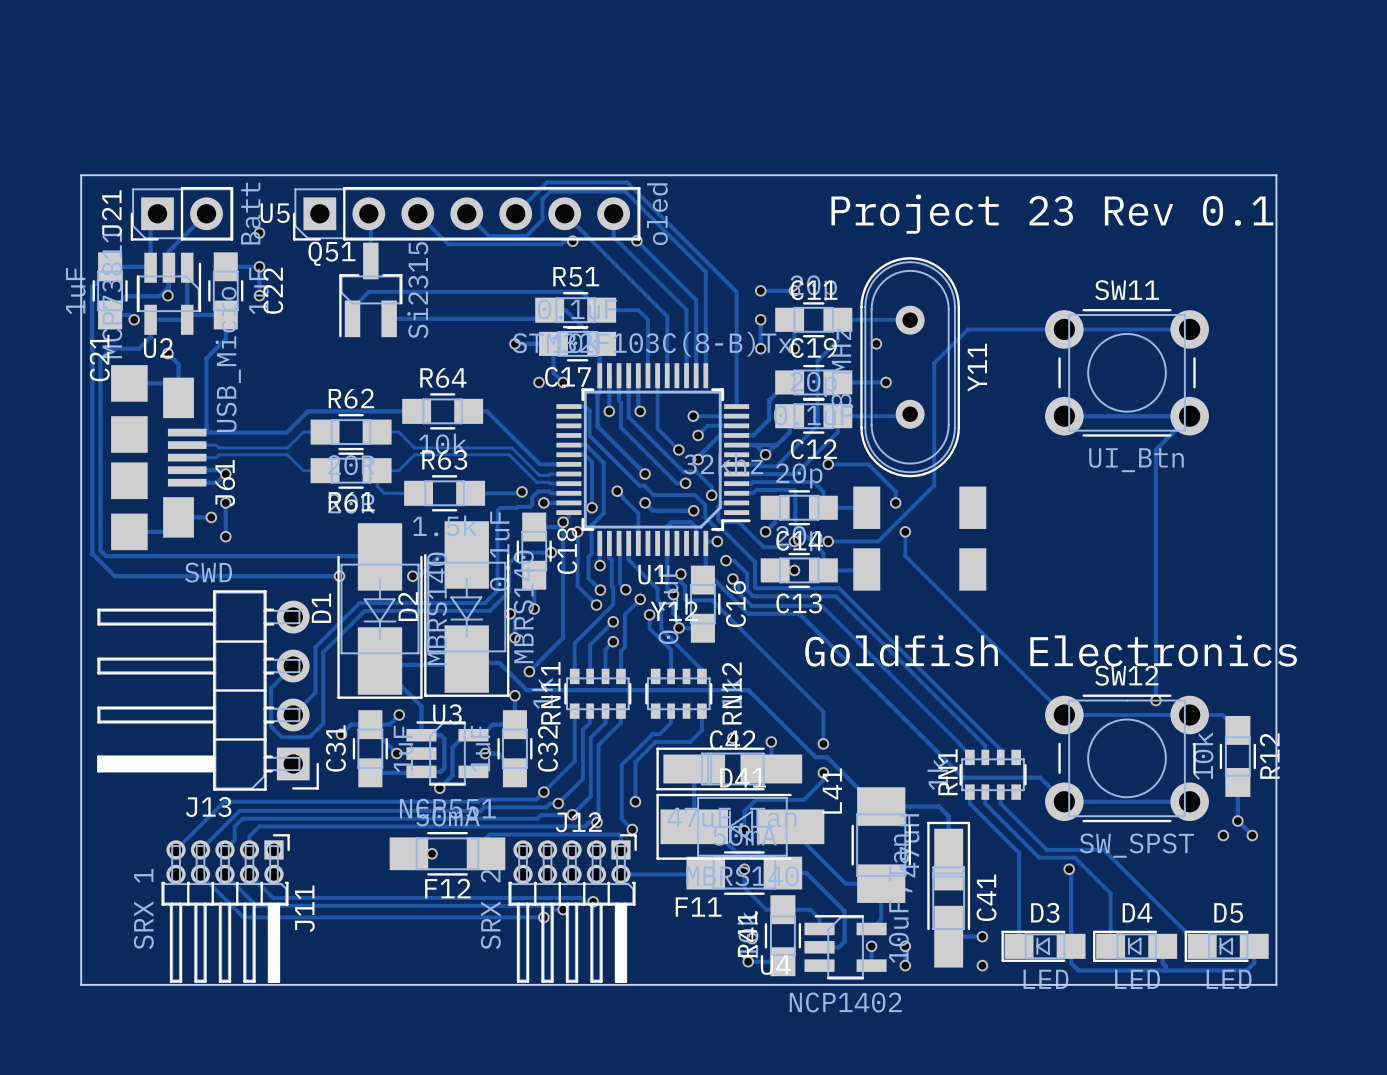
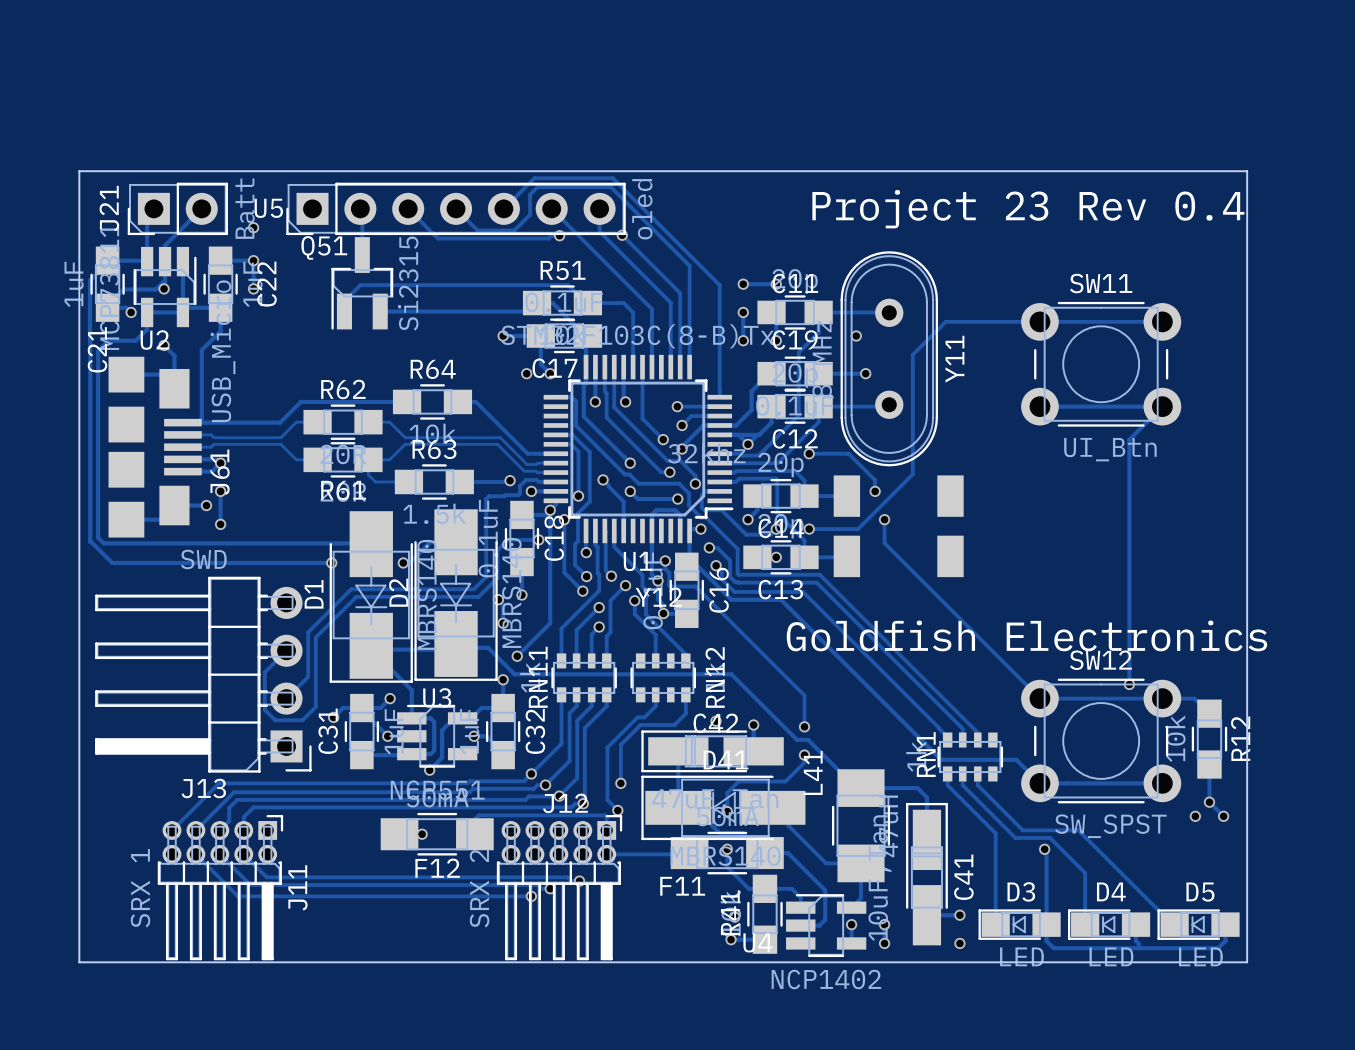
text: Project 23 Rev 0.1 (1052, 214) -> Project 23 Rev 0.4 (1028, 209)

